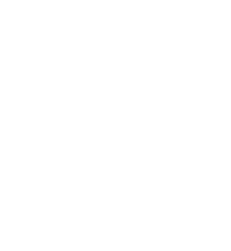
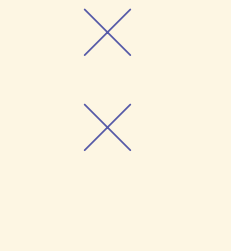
no-connect mark: none -> (107, 32)
no-connect mark: none -> (107, 127)

